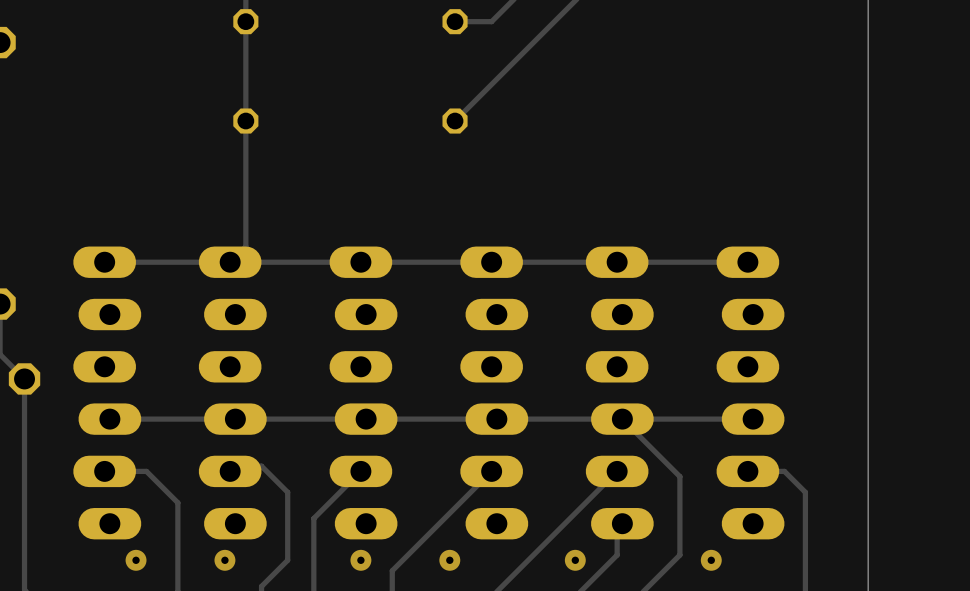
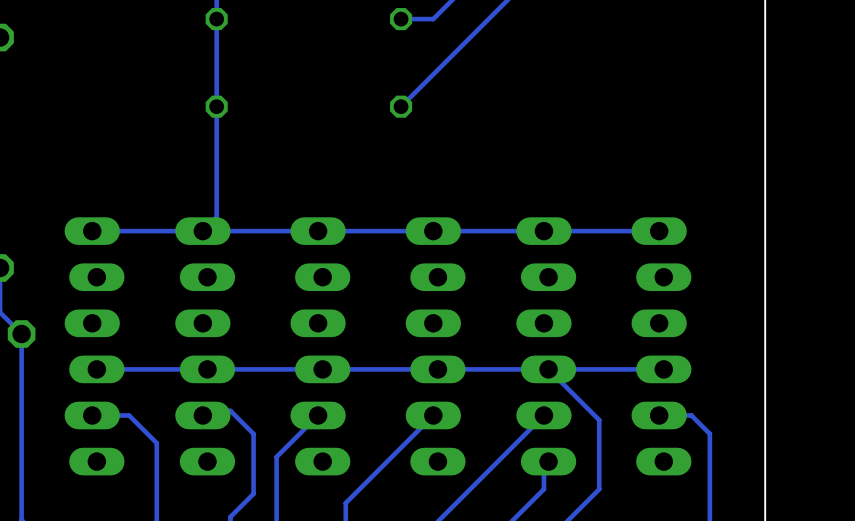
via: (136, 560) -> none
via: (224, 560) -> none
via: (360, 560) -> none
via: (449, 560) -> none
via: (575, 560) -> none
via: (711, 560) -> none

